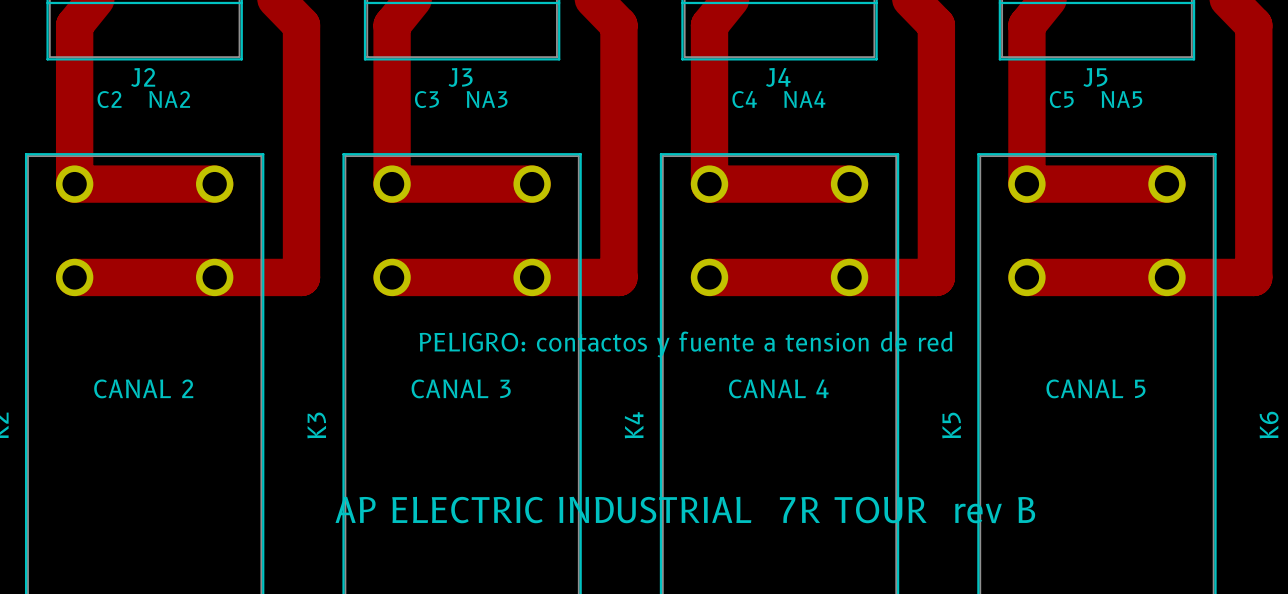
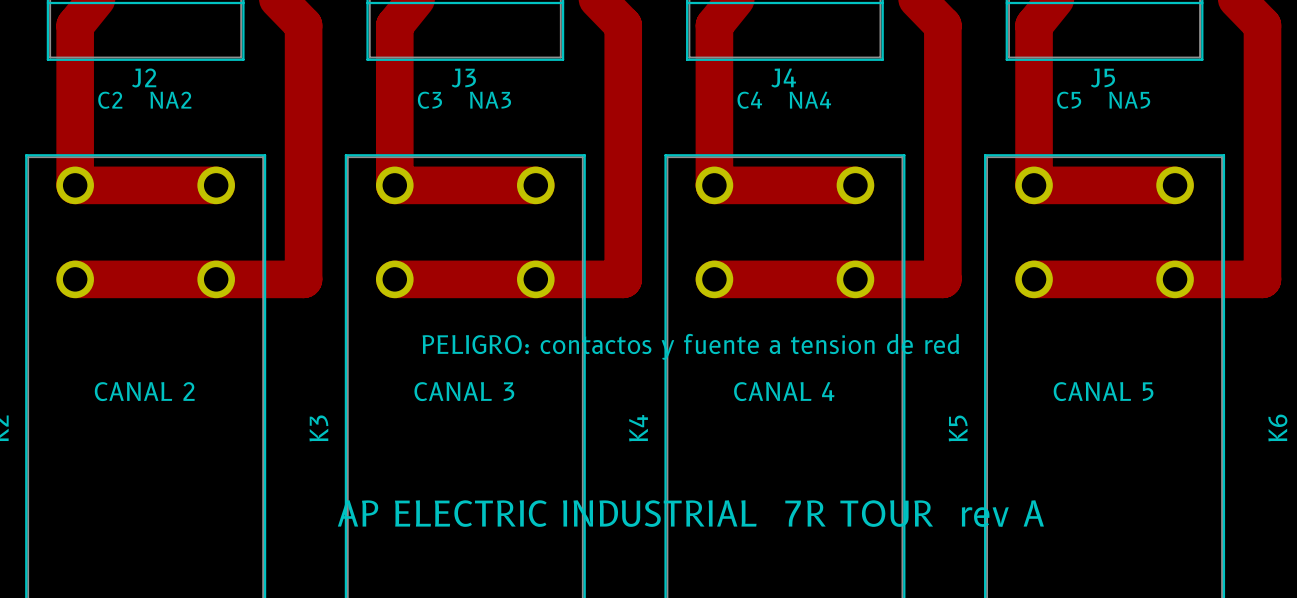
text: AP ELECTRIC INDUSTRIAL 7R TOUR rev B (685, 510) -> AP ELECTRIC INDUSTRIAL 7R TOUR rev A (690, 513)

